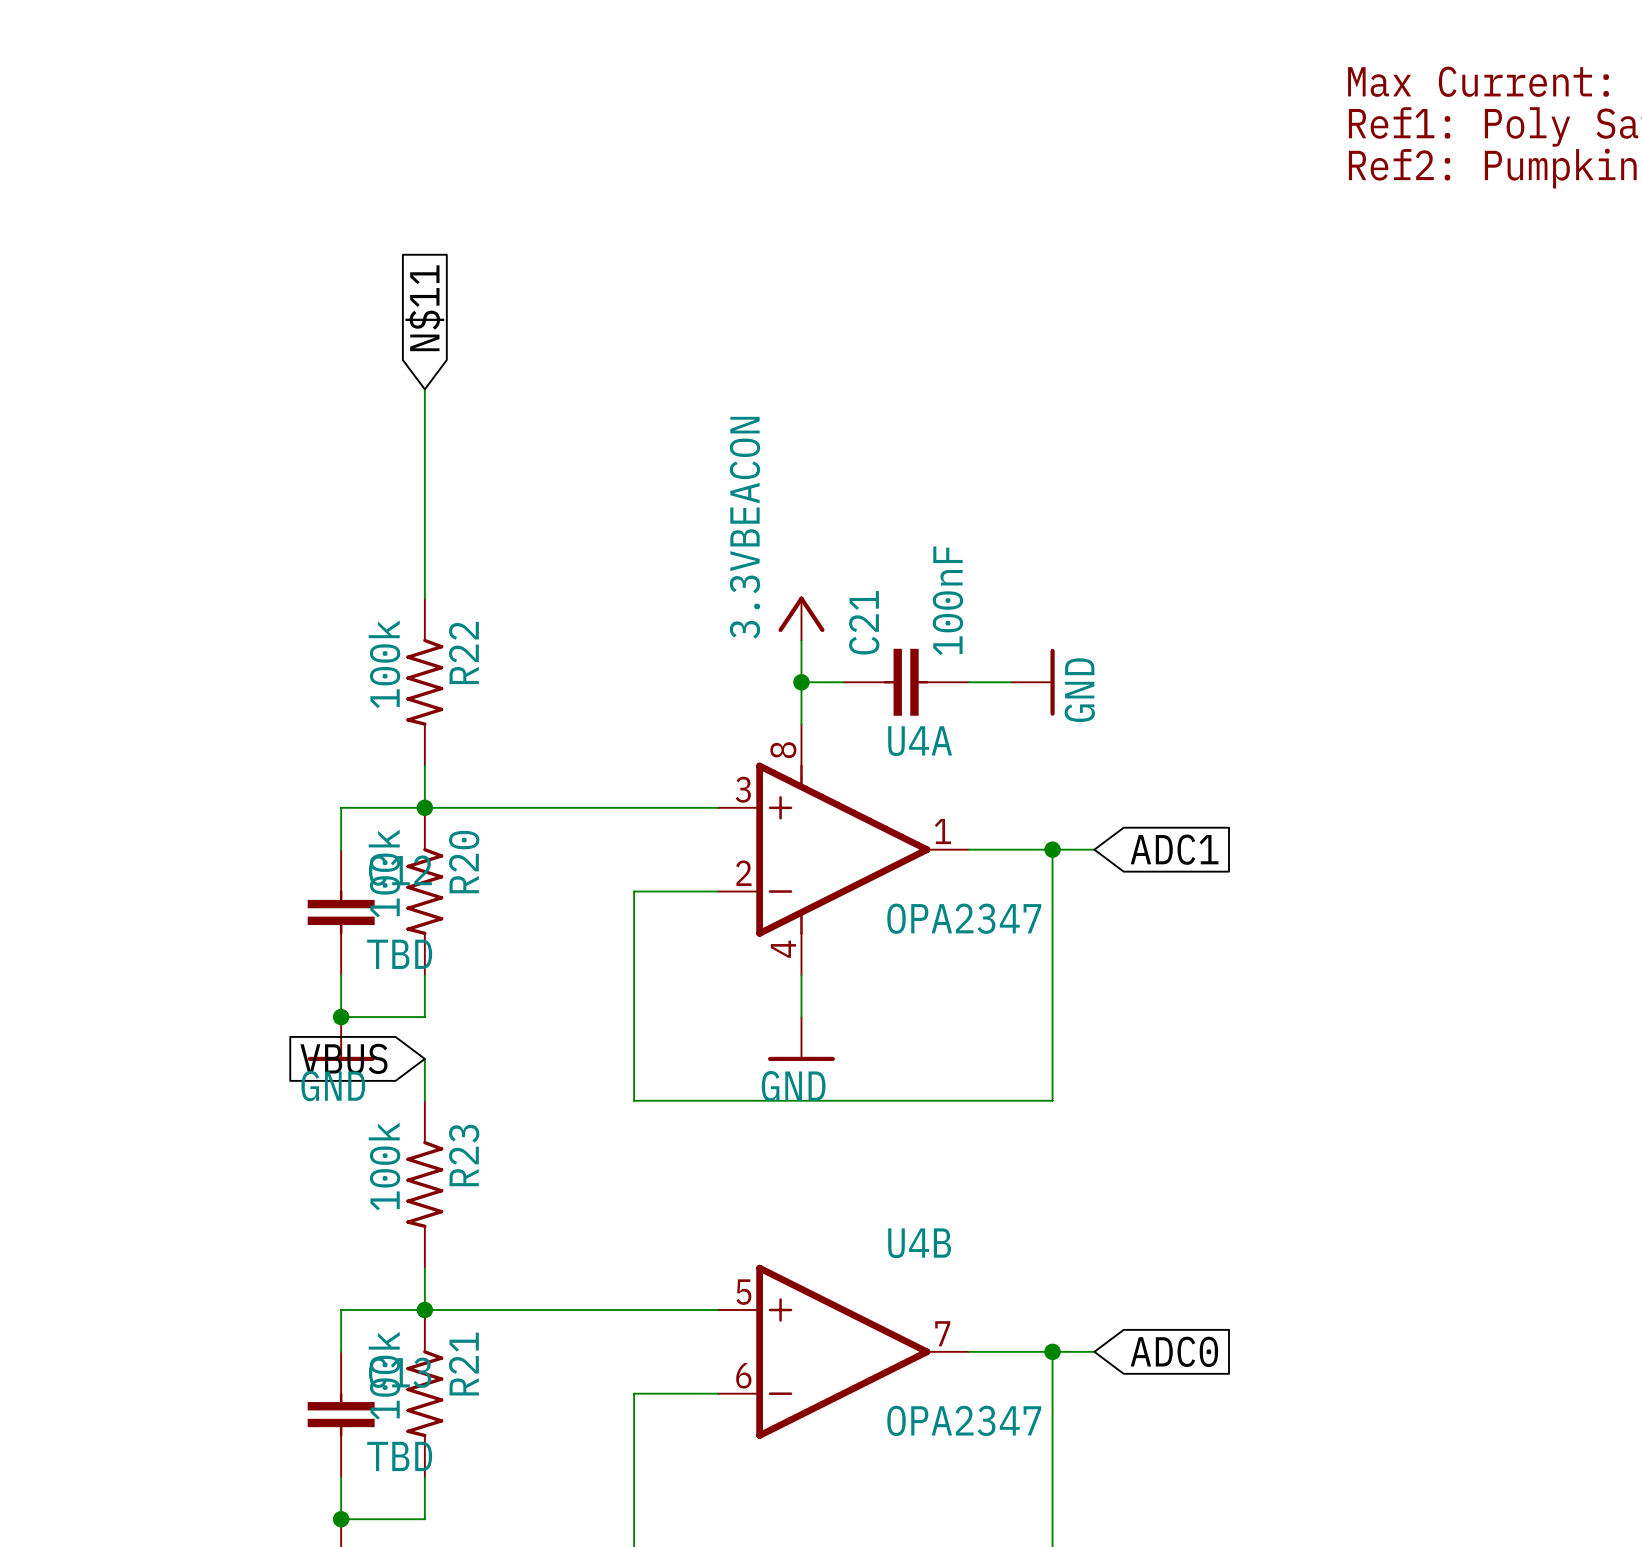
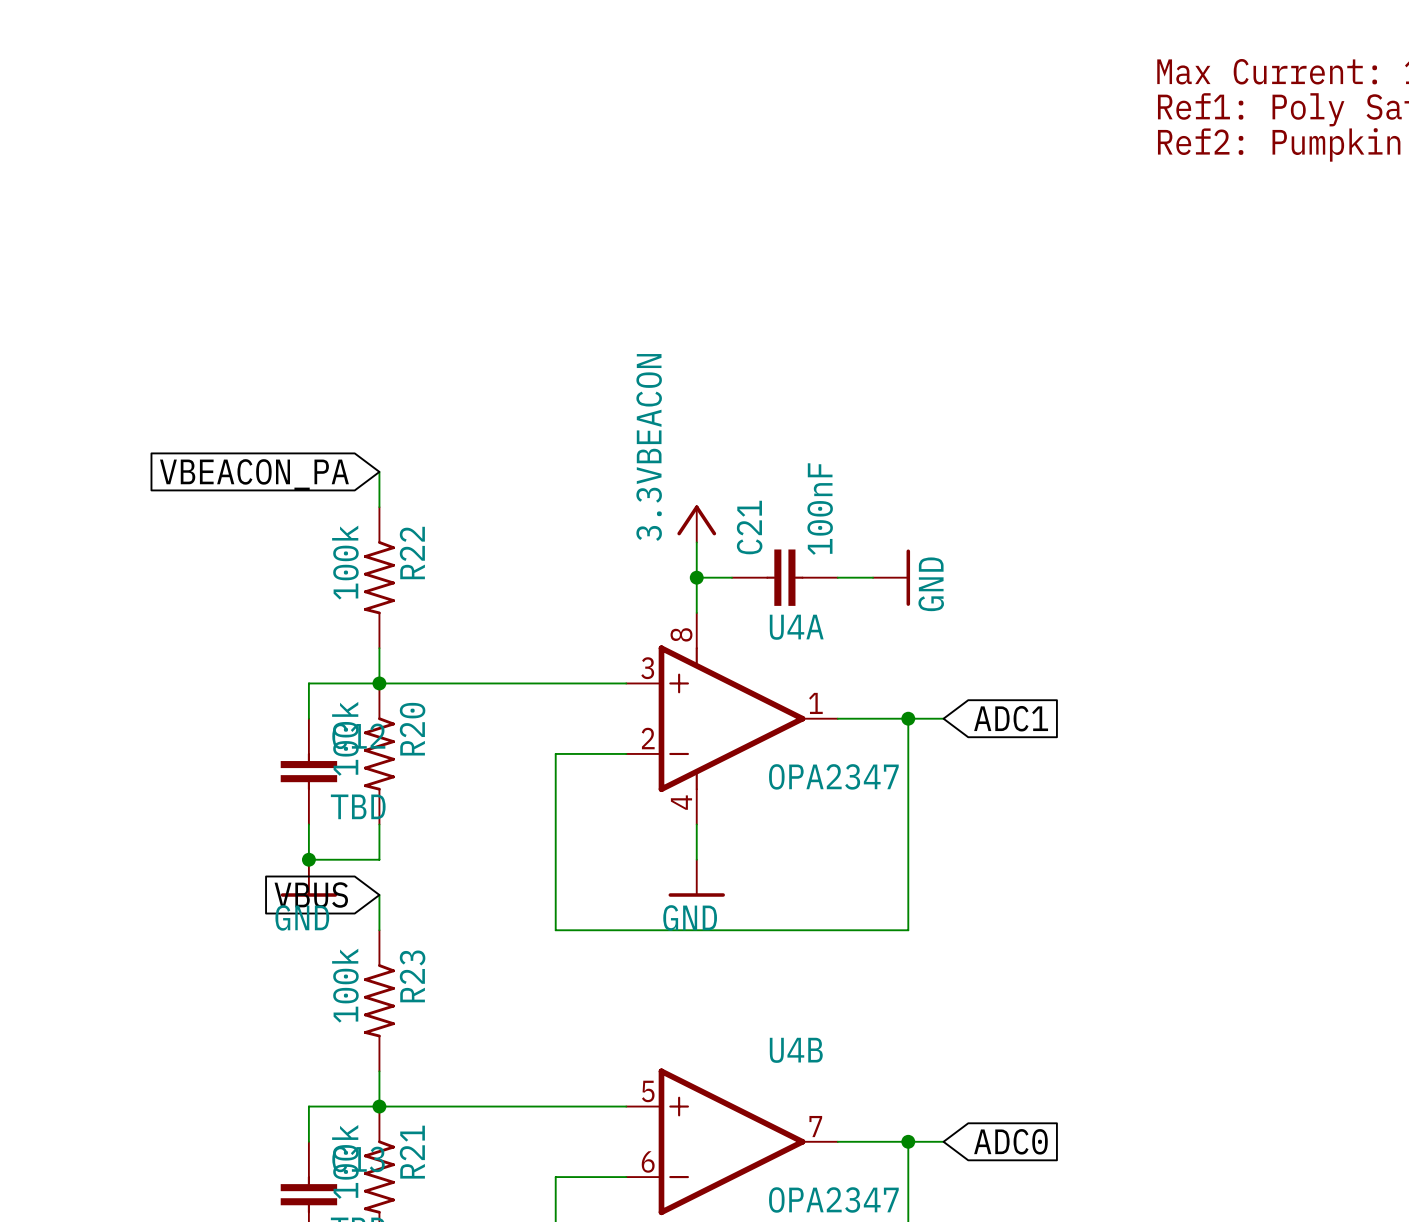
global label: N$11 (424, 308) -> none
wire: (424, 389) (424, 556) -> none
global label: none -> VBEACON_PA (254, 474)

